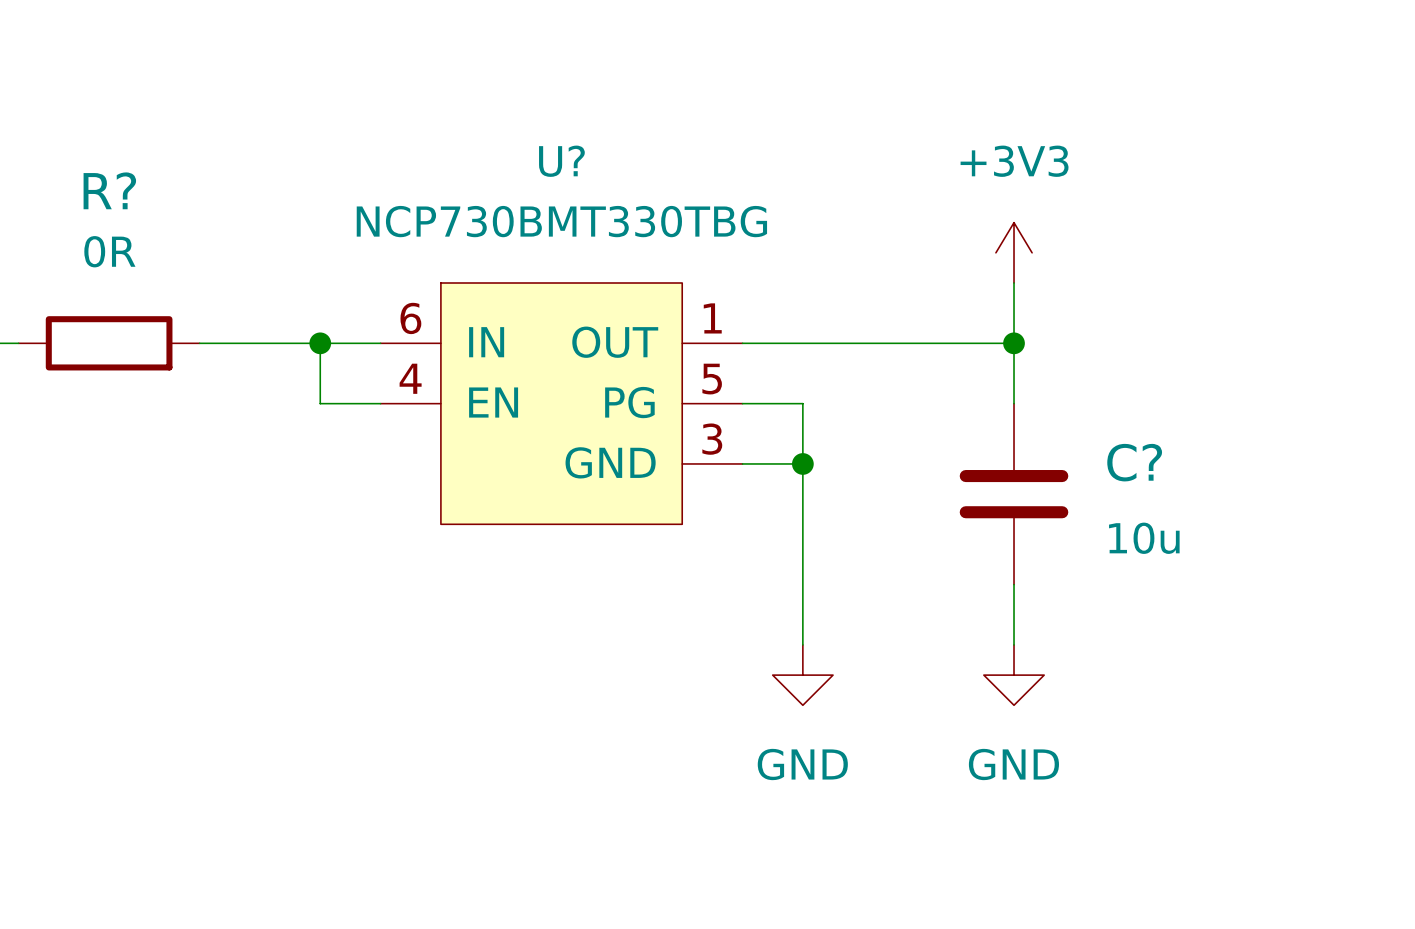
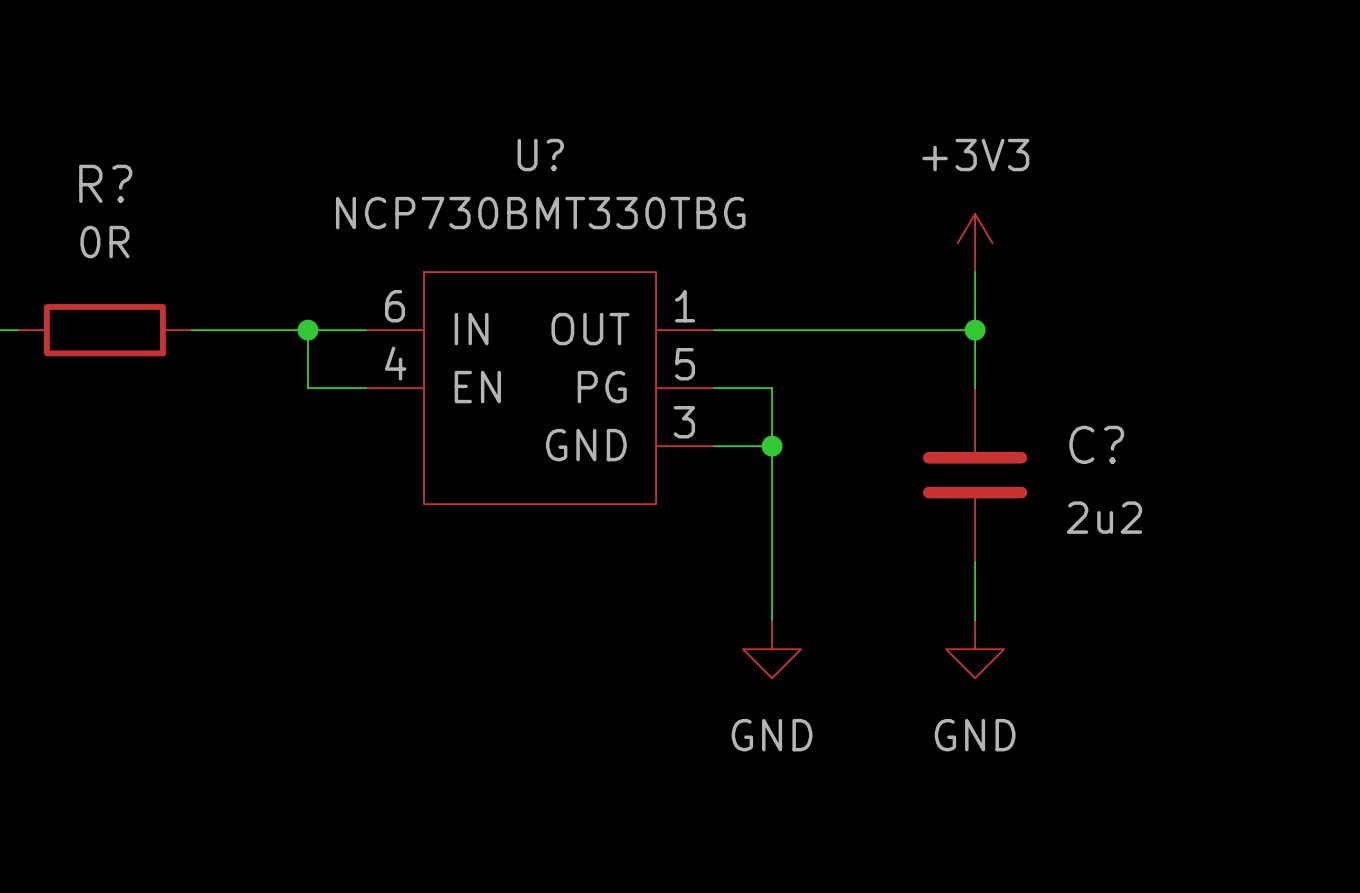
C? text: 10u (1144, 538) -> 2u2 (1104, 517)

